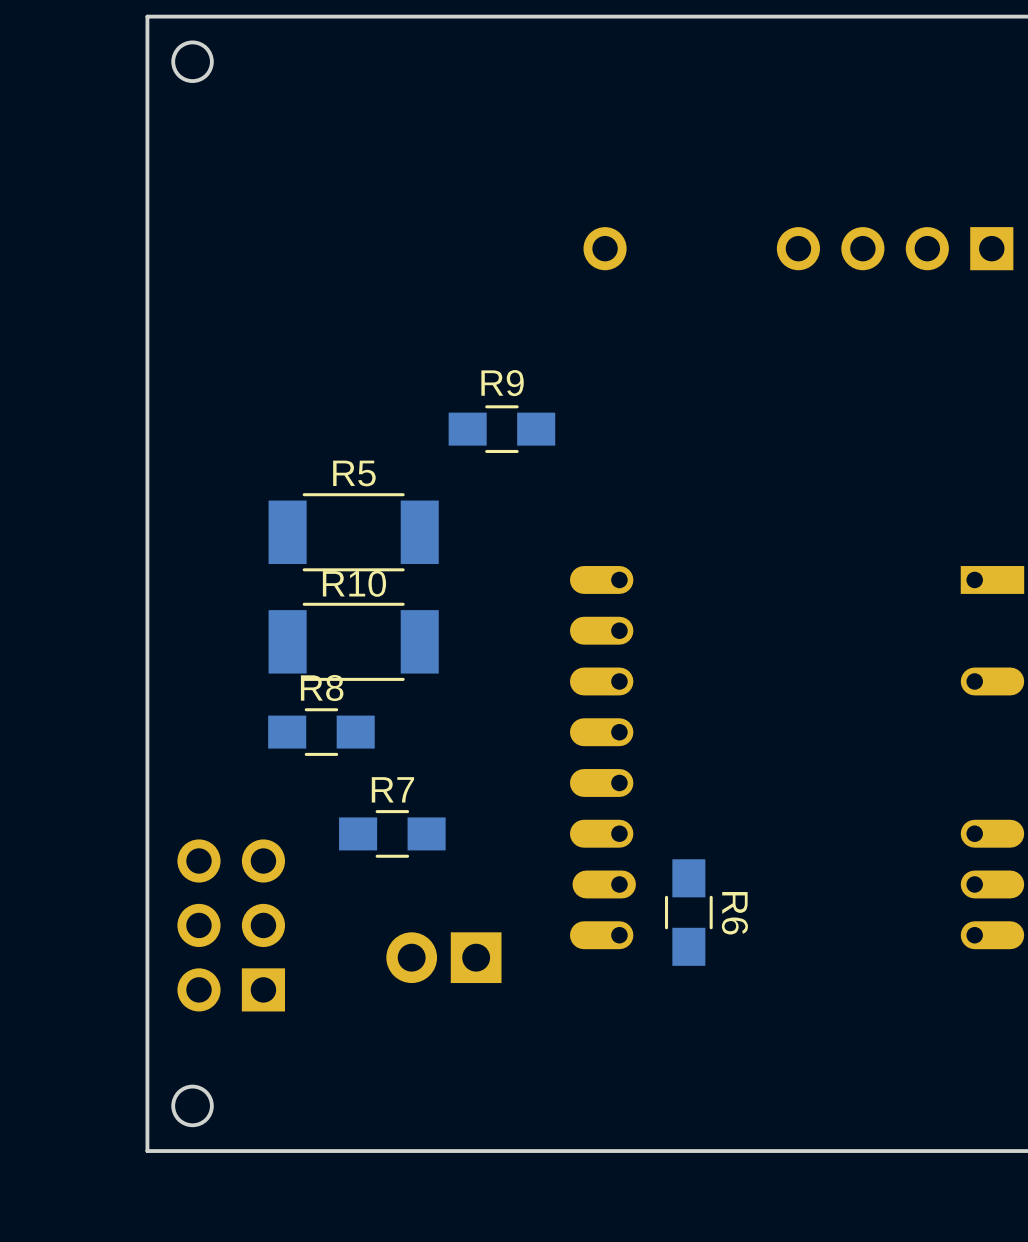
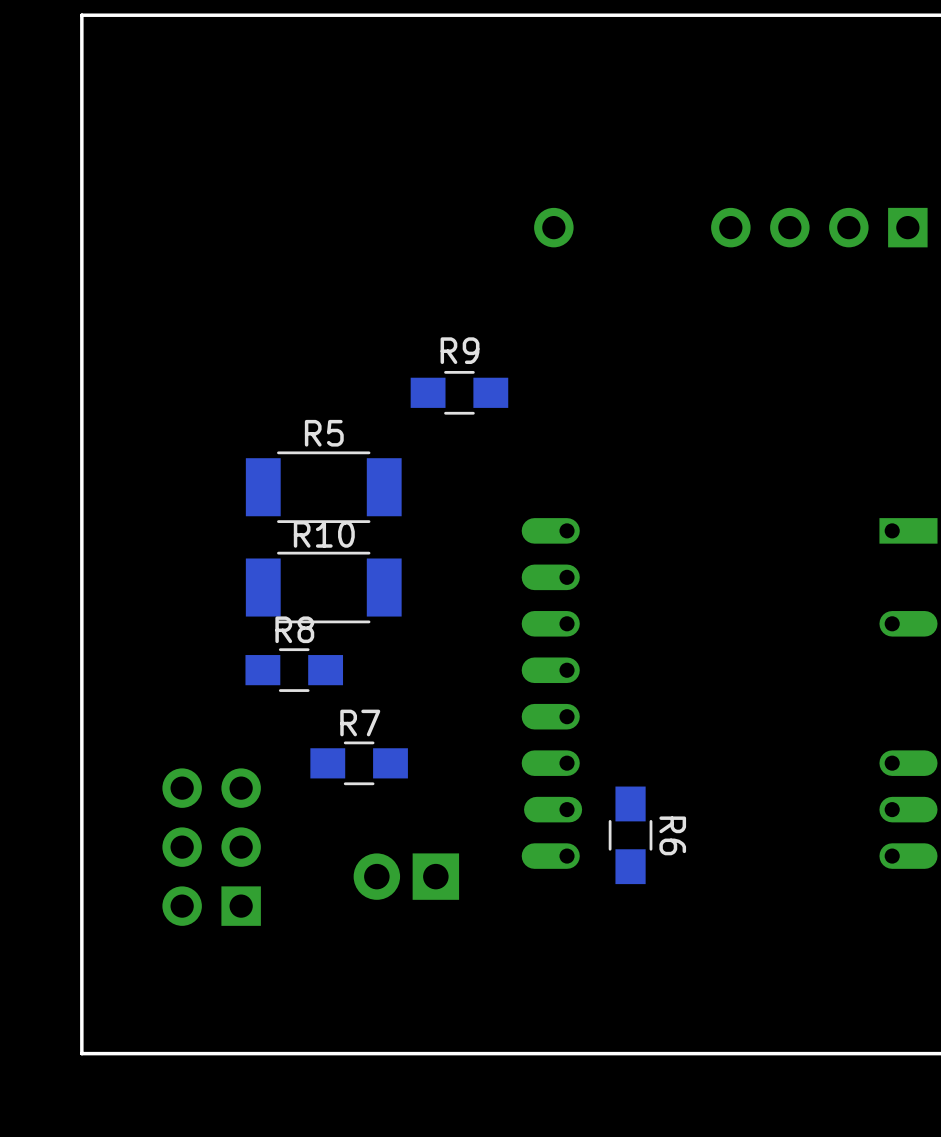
board edge: (147, 16) (147, 1151) -> (134, 15) (81, 15) (81, 1053) (134, 1053)
round board edge: [171, 40, 214, 83] -> none
round board edge: [171, 1084, 214, 1128] -> none

